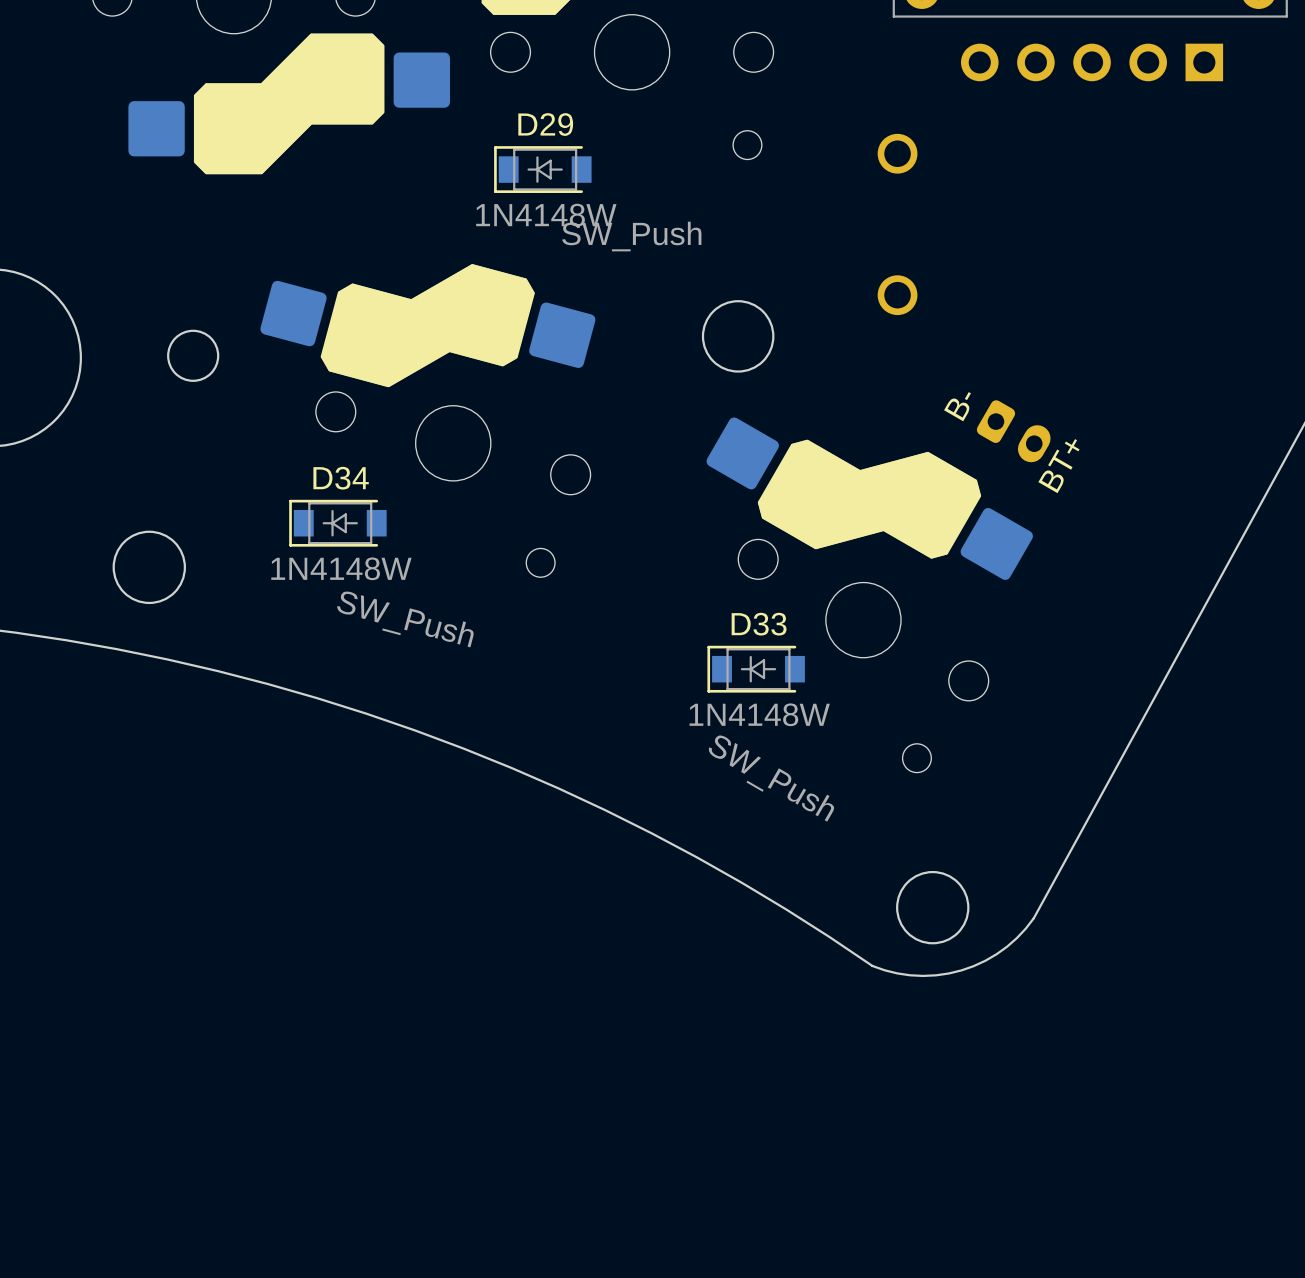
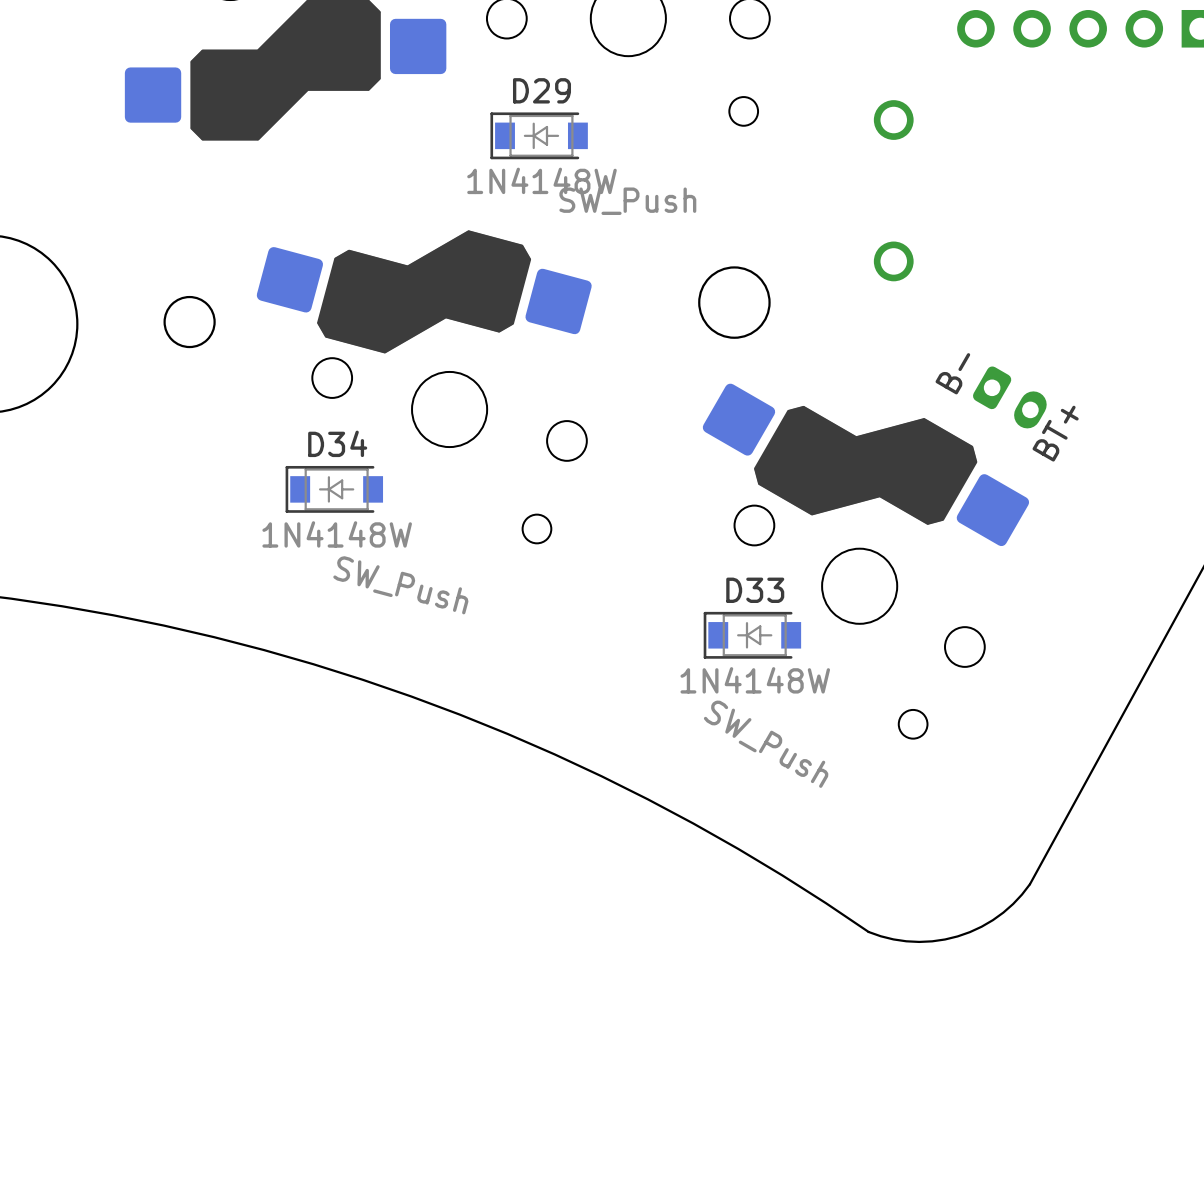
round board edge: [112, 530, 186, 605] -> none
round board edge: [896, 870, 970, 945] -> none

